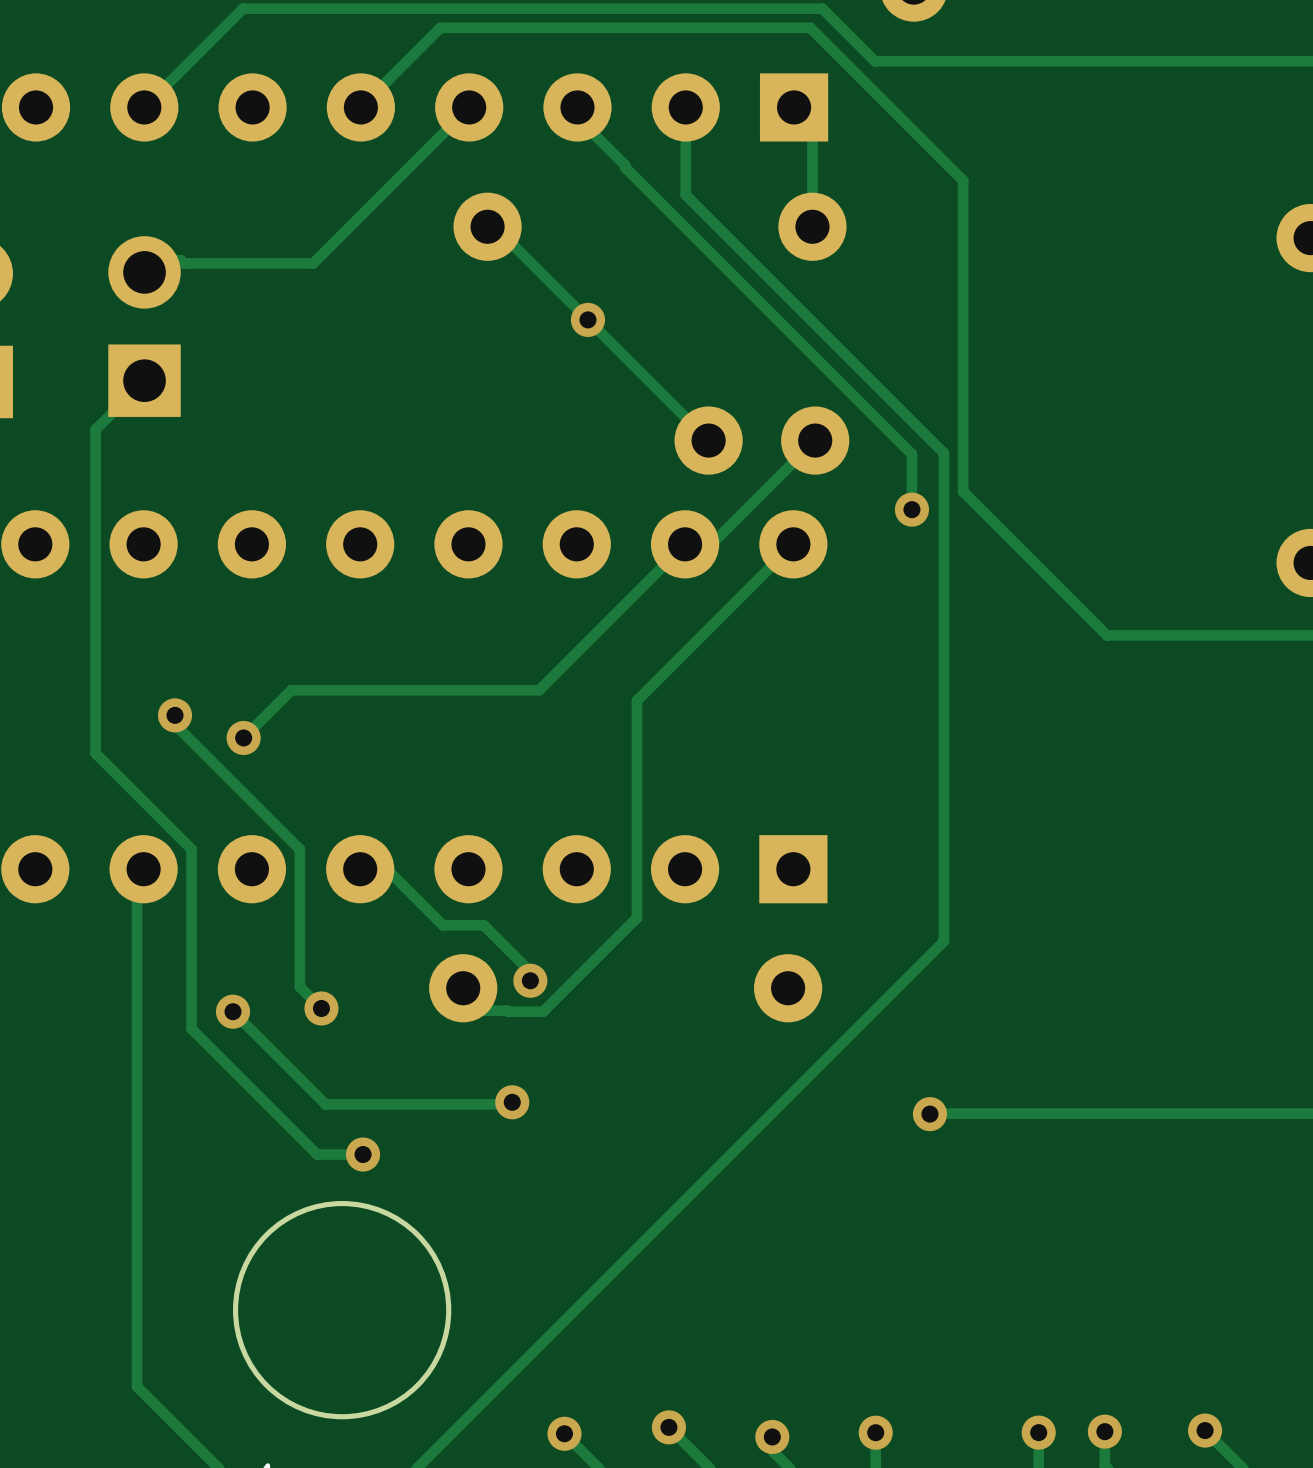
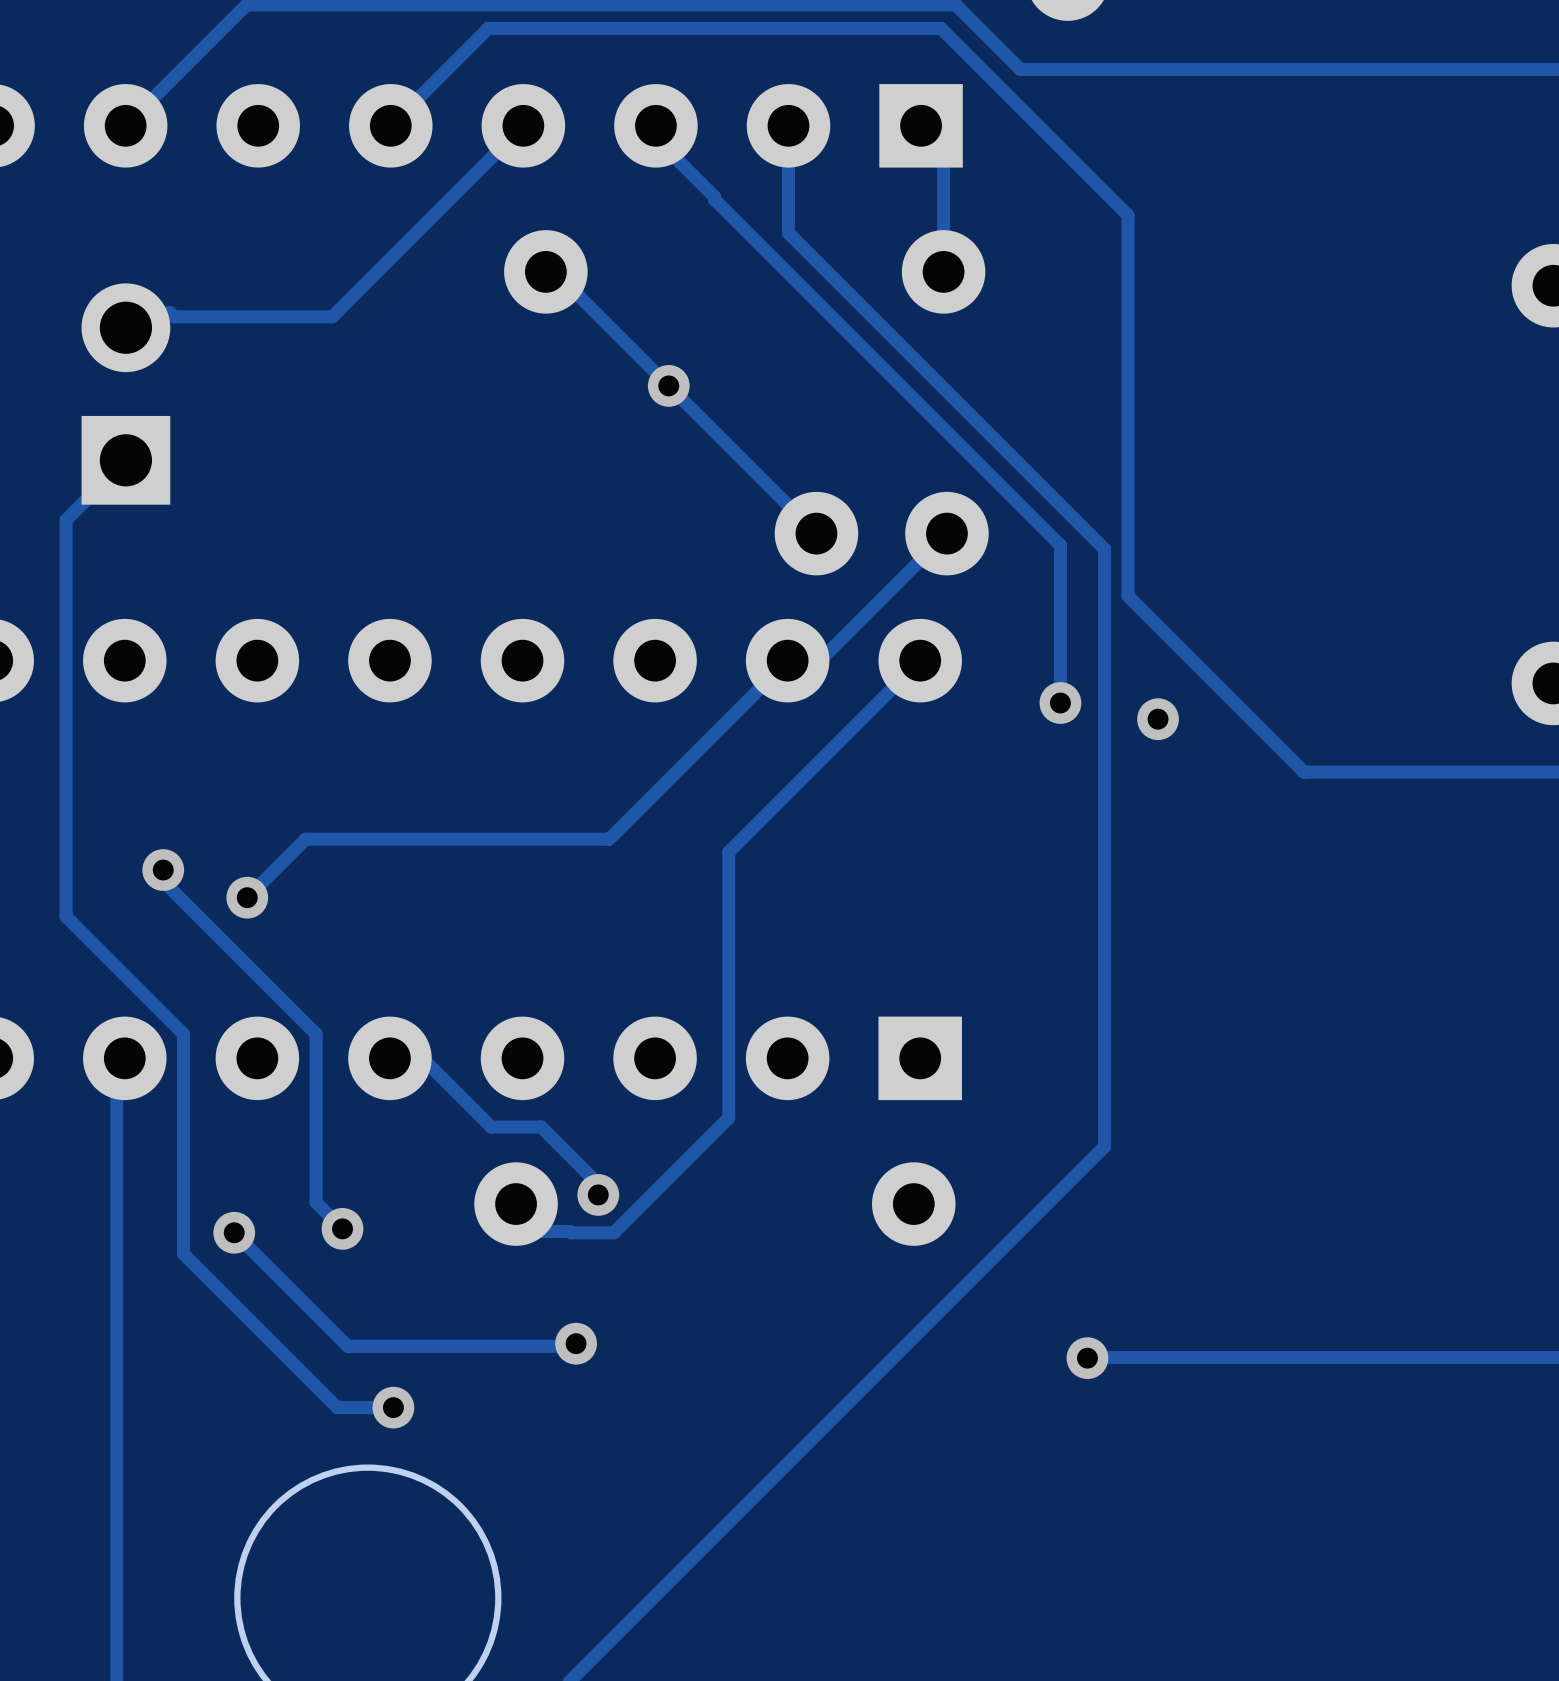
track: (907, 450) (911, 454) (911, 509) -> (1060, 545) (1060, 703)
via: (911, 509) -> none
via: none -> (1060, 703)
via: none -> (1158, 719)

